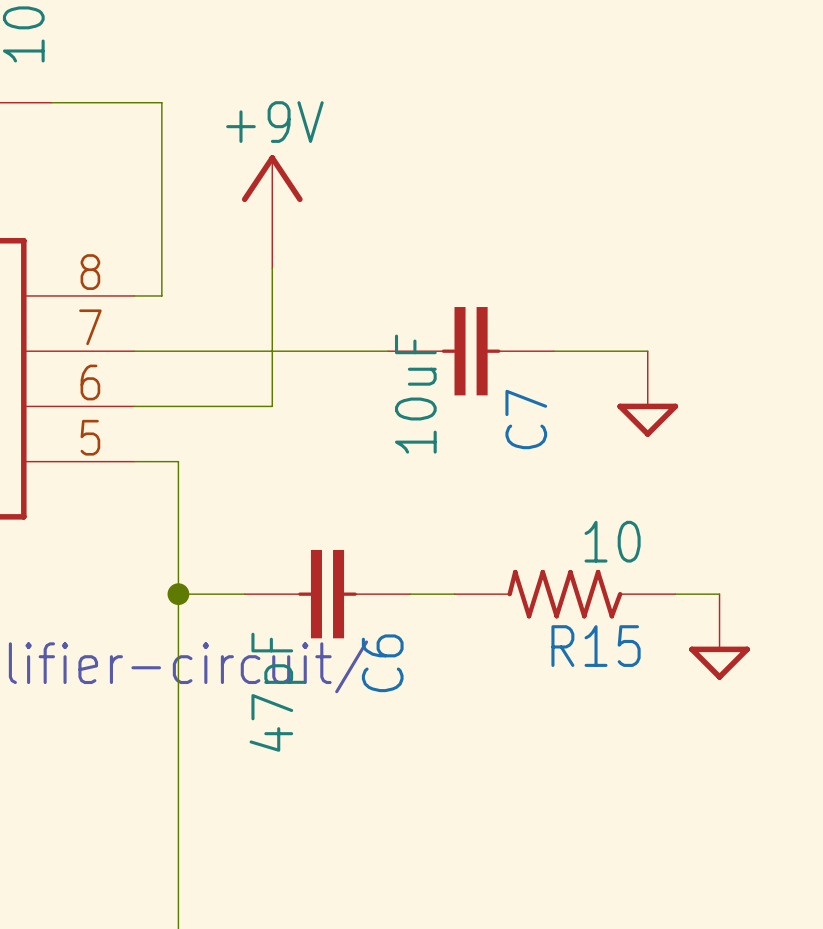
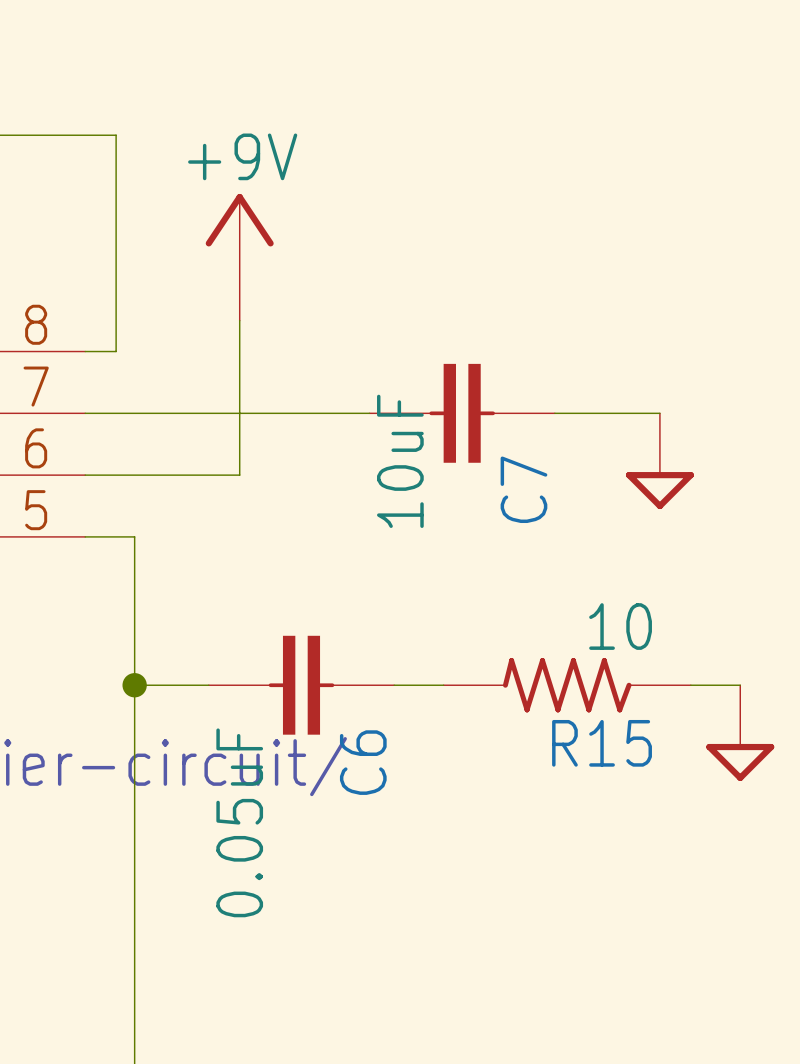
C6 value: 47pF (277, 692) -> 0.05uF (239, 822)

